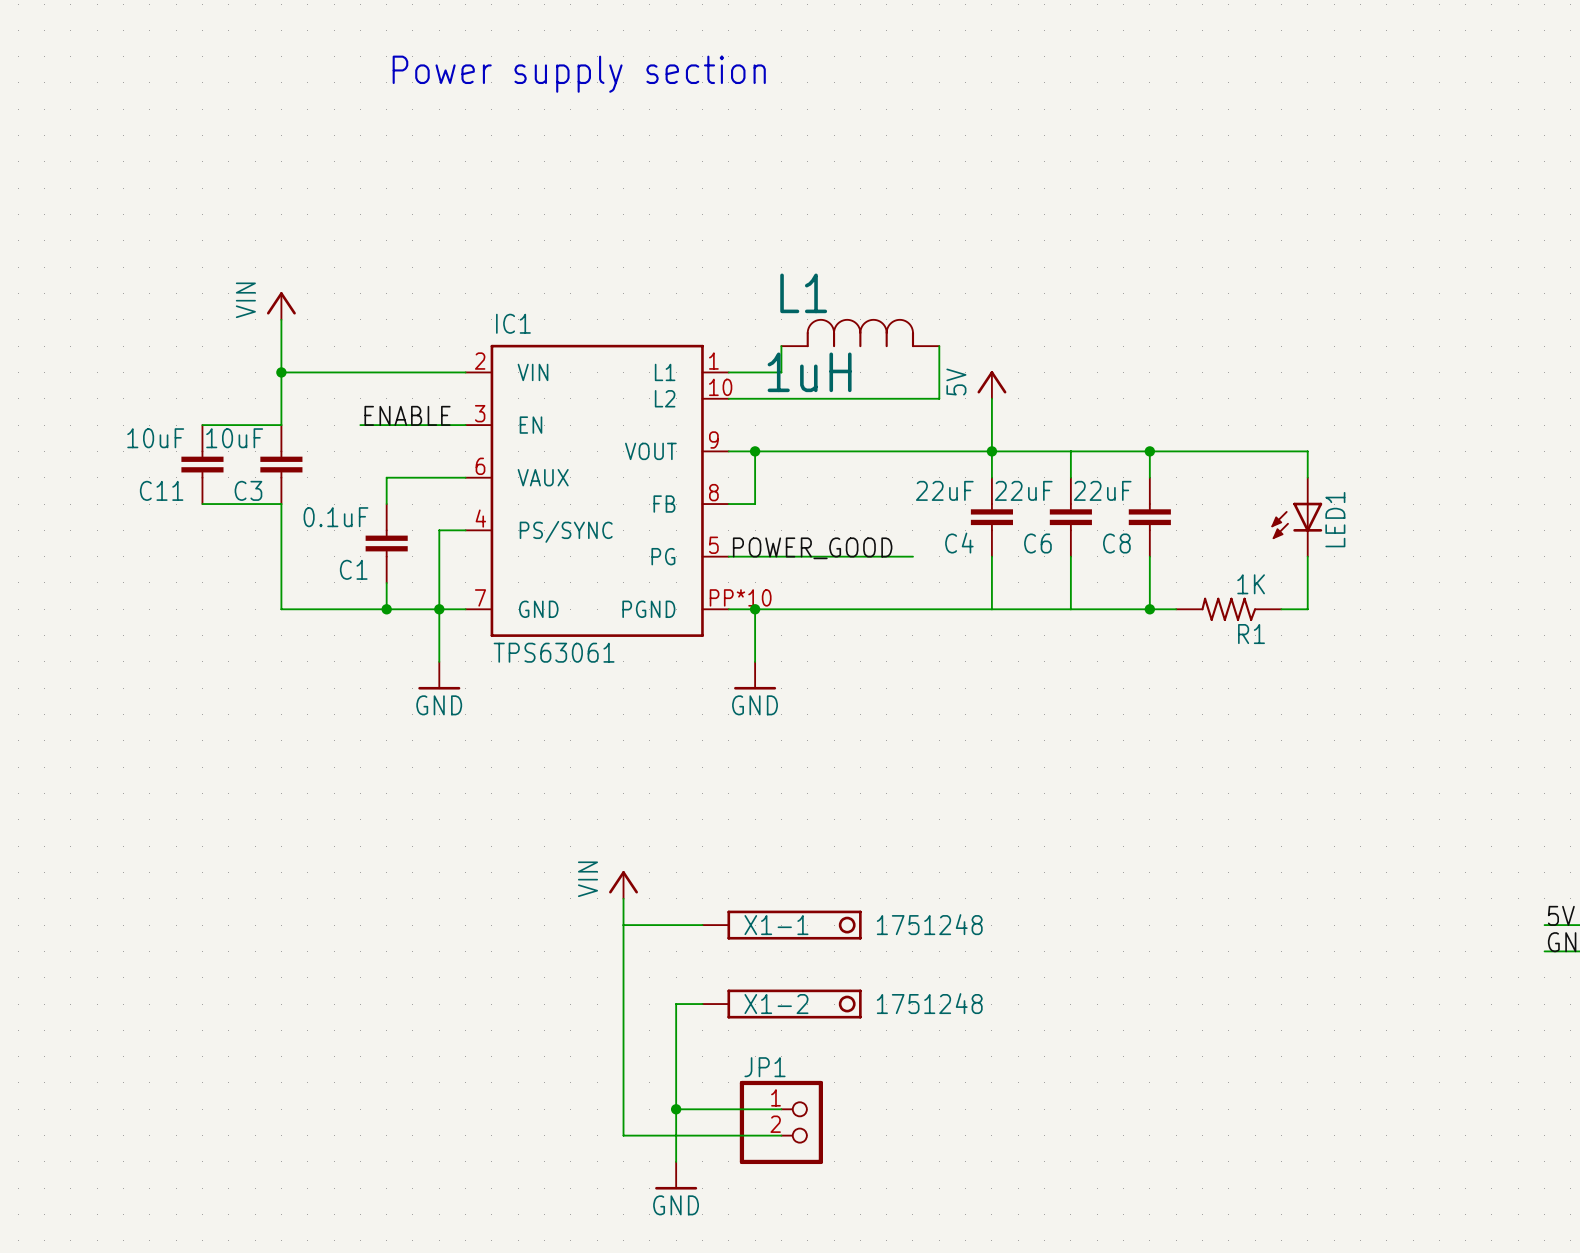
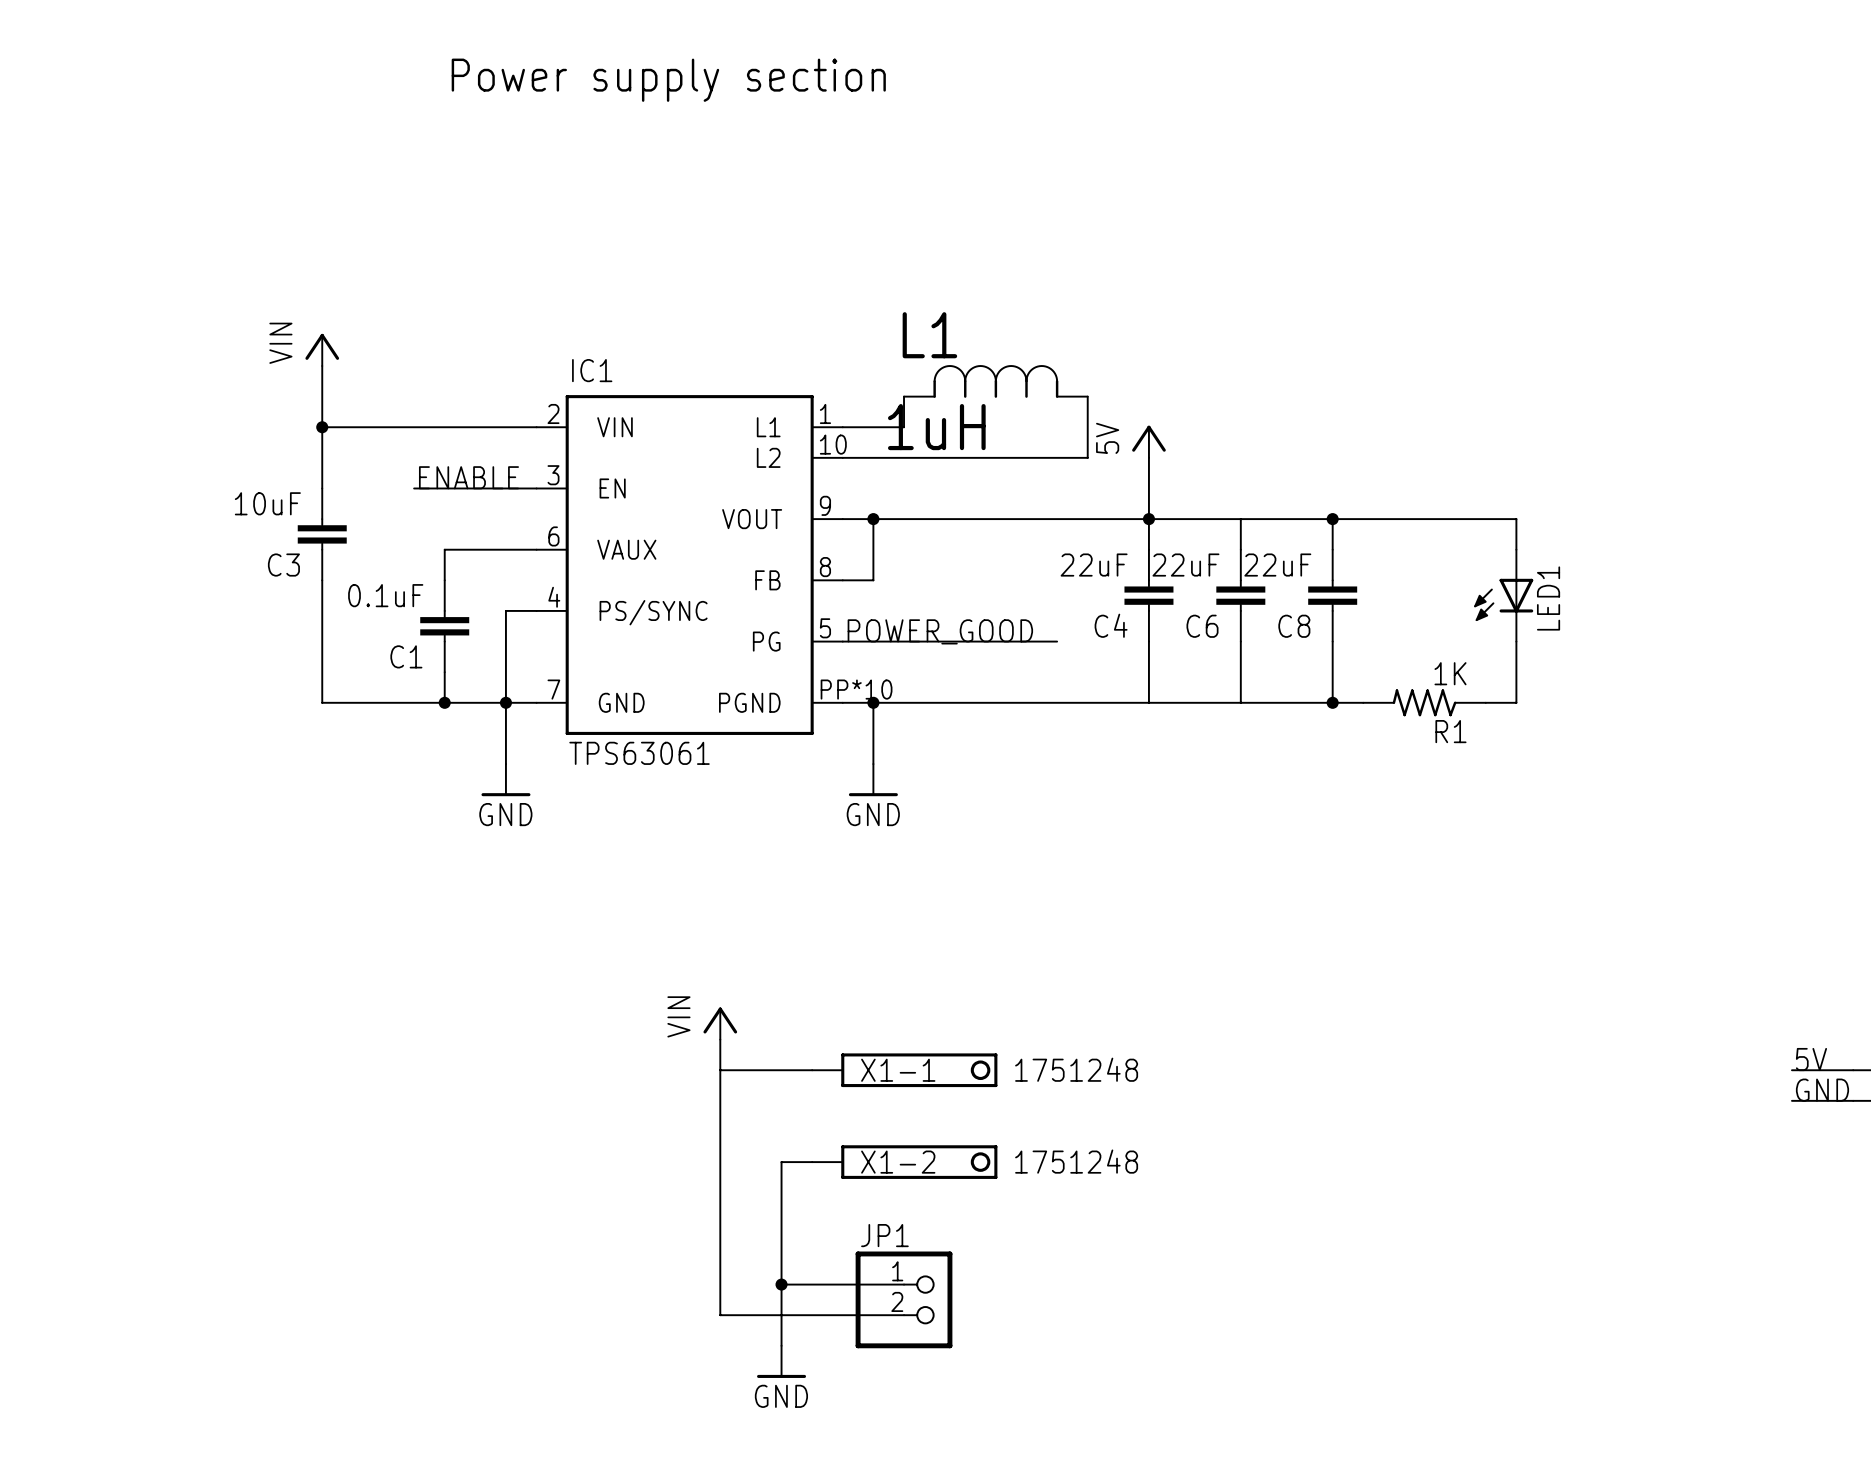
wire: (202, 425) (281, 425) -> none
C11: 10uF (202, 464) -> none
wire: (202, 504) (281, 504) -> none

